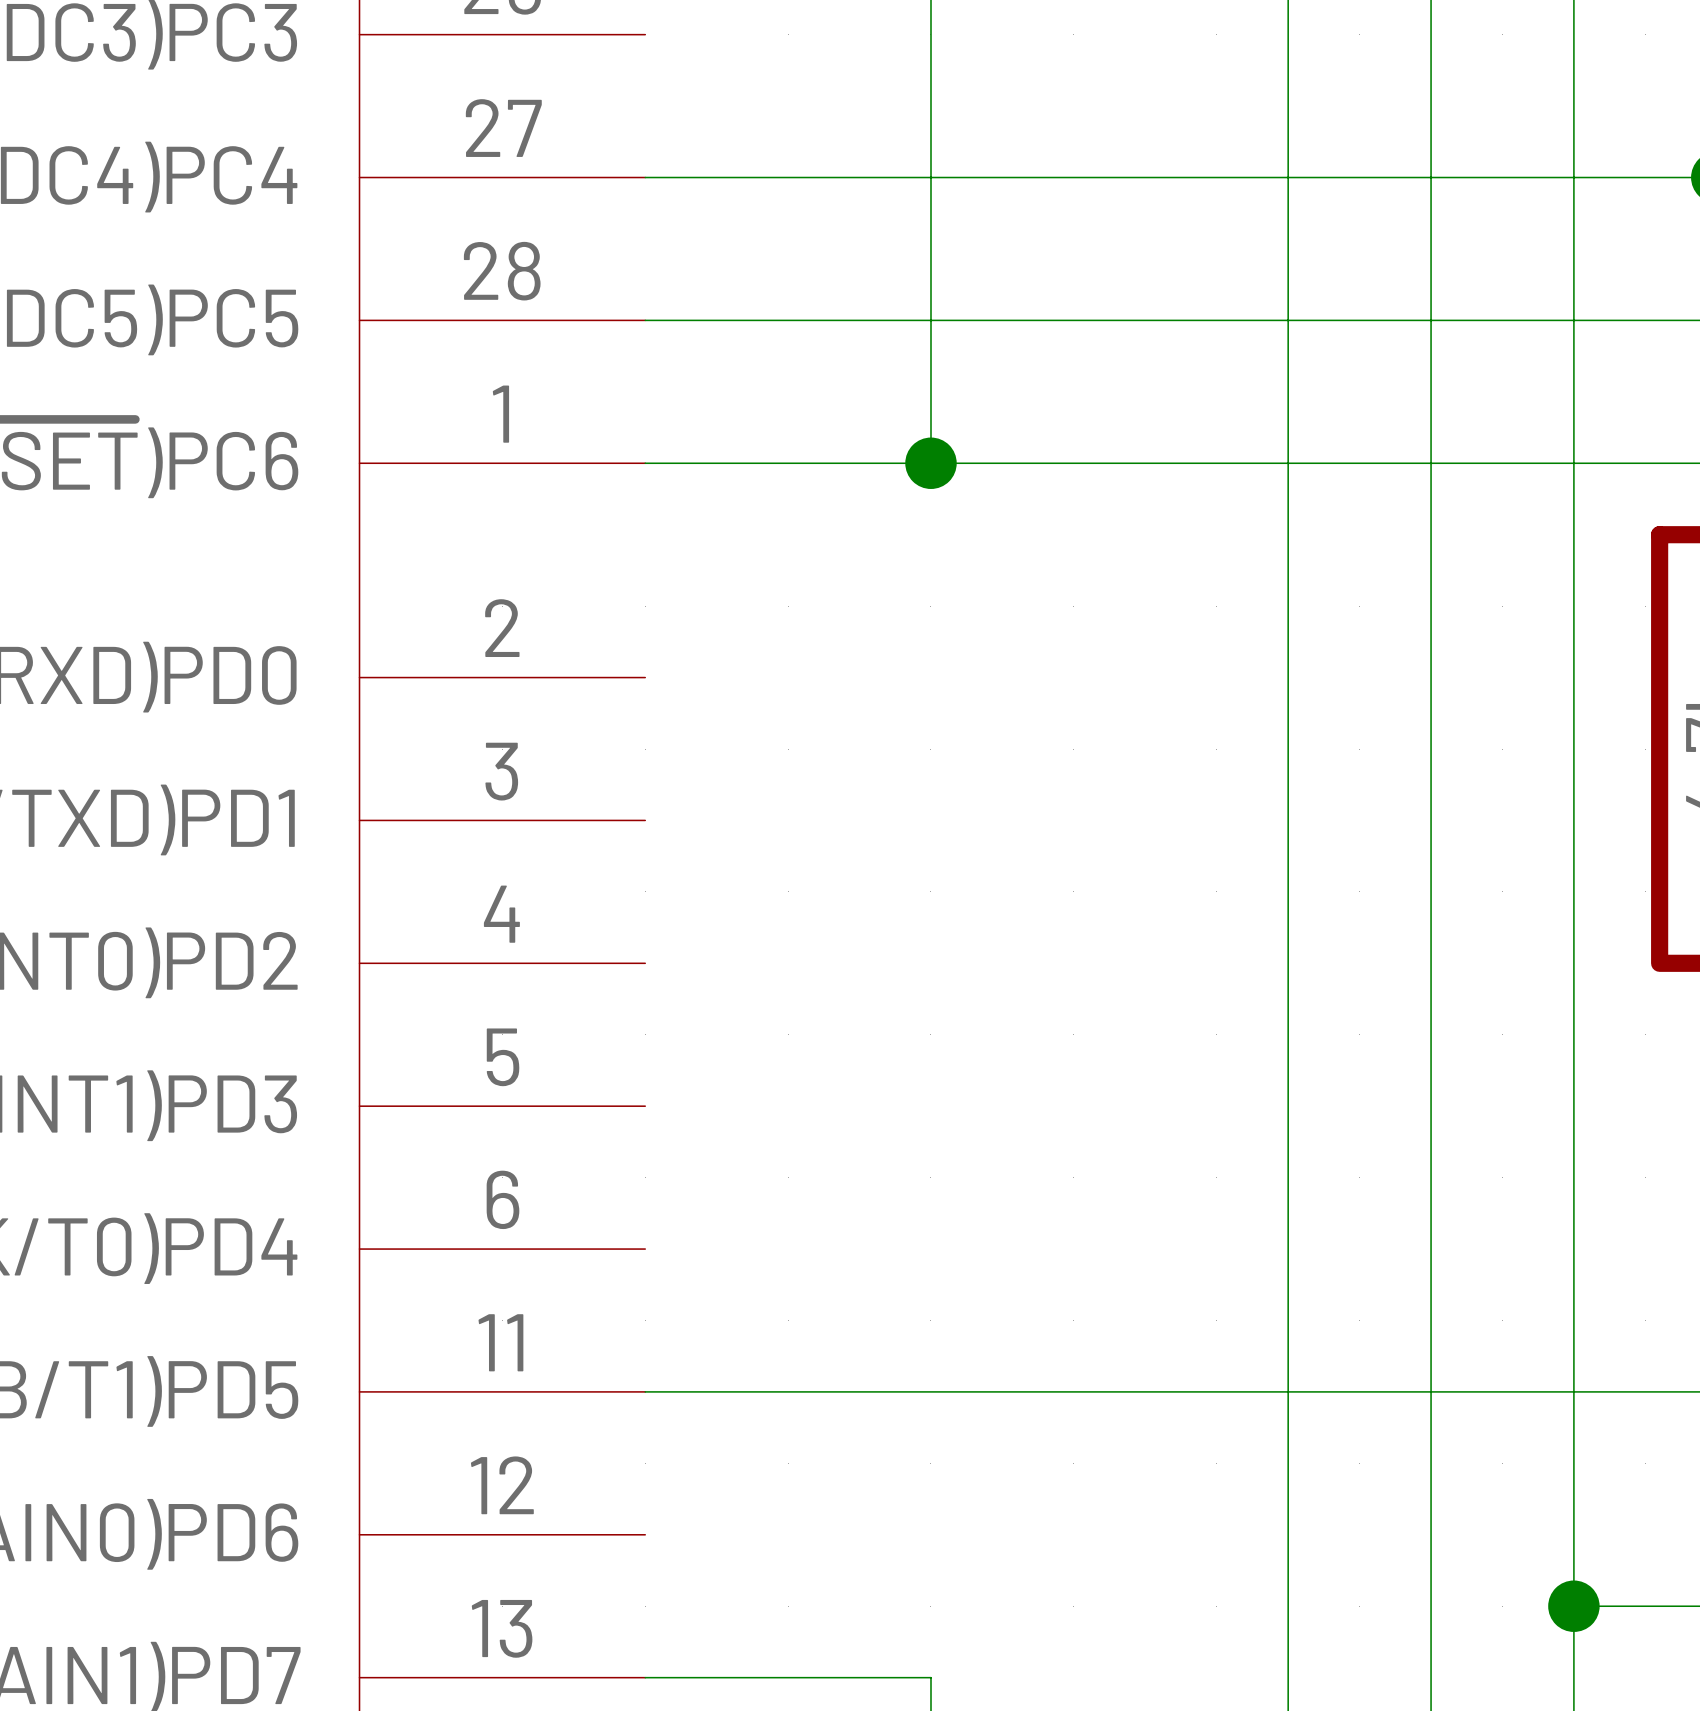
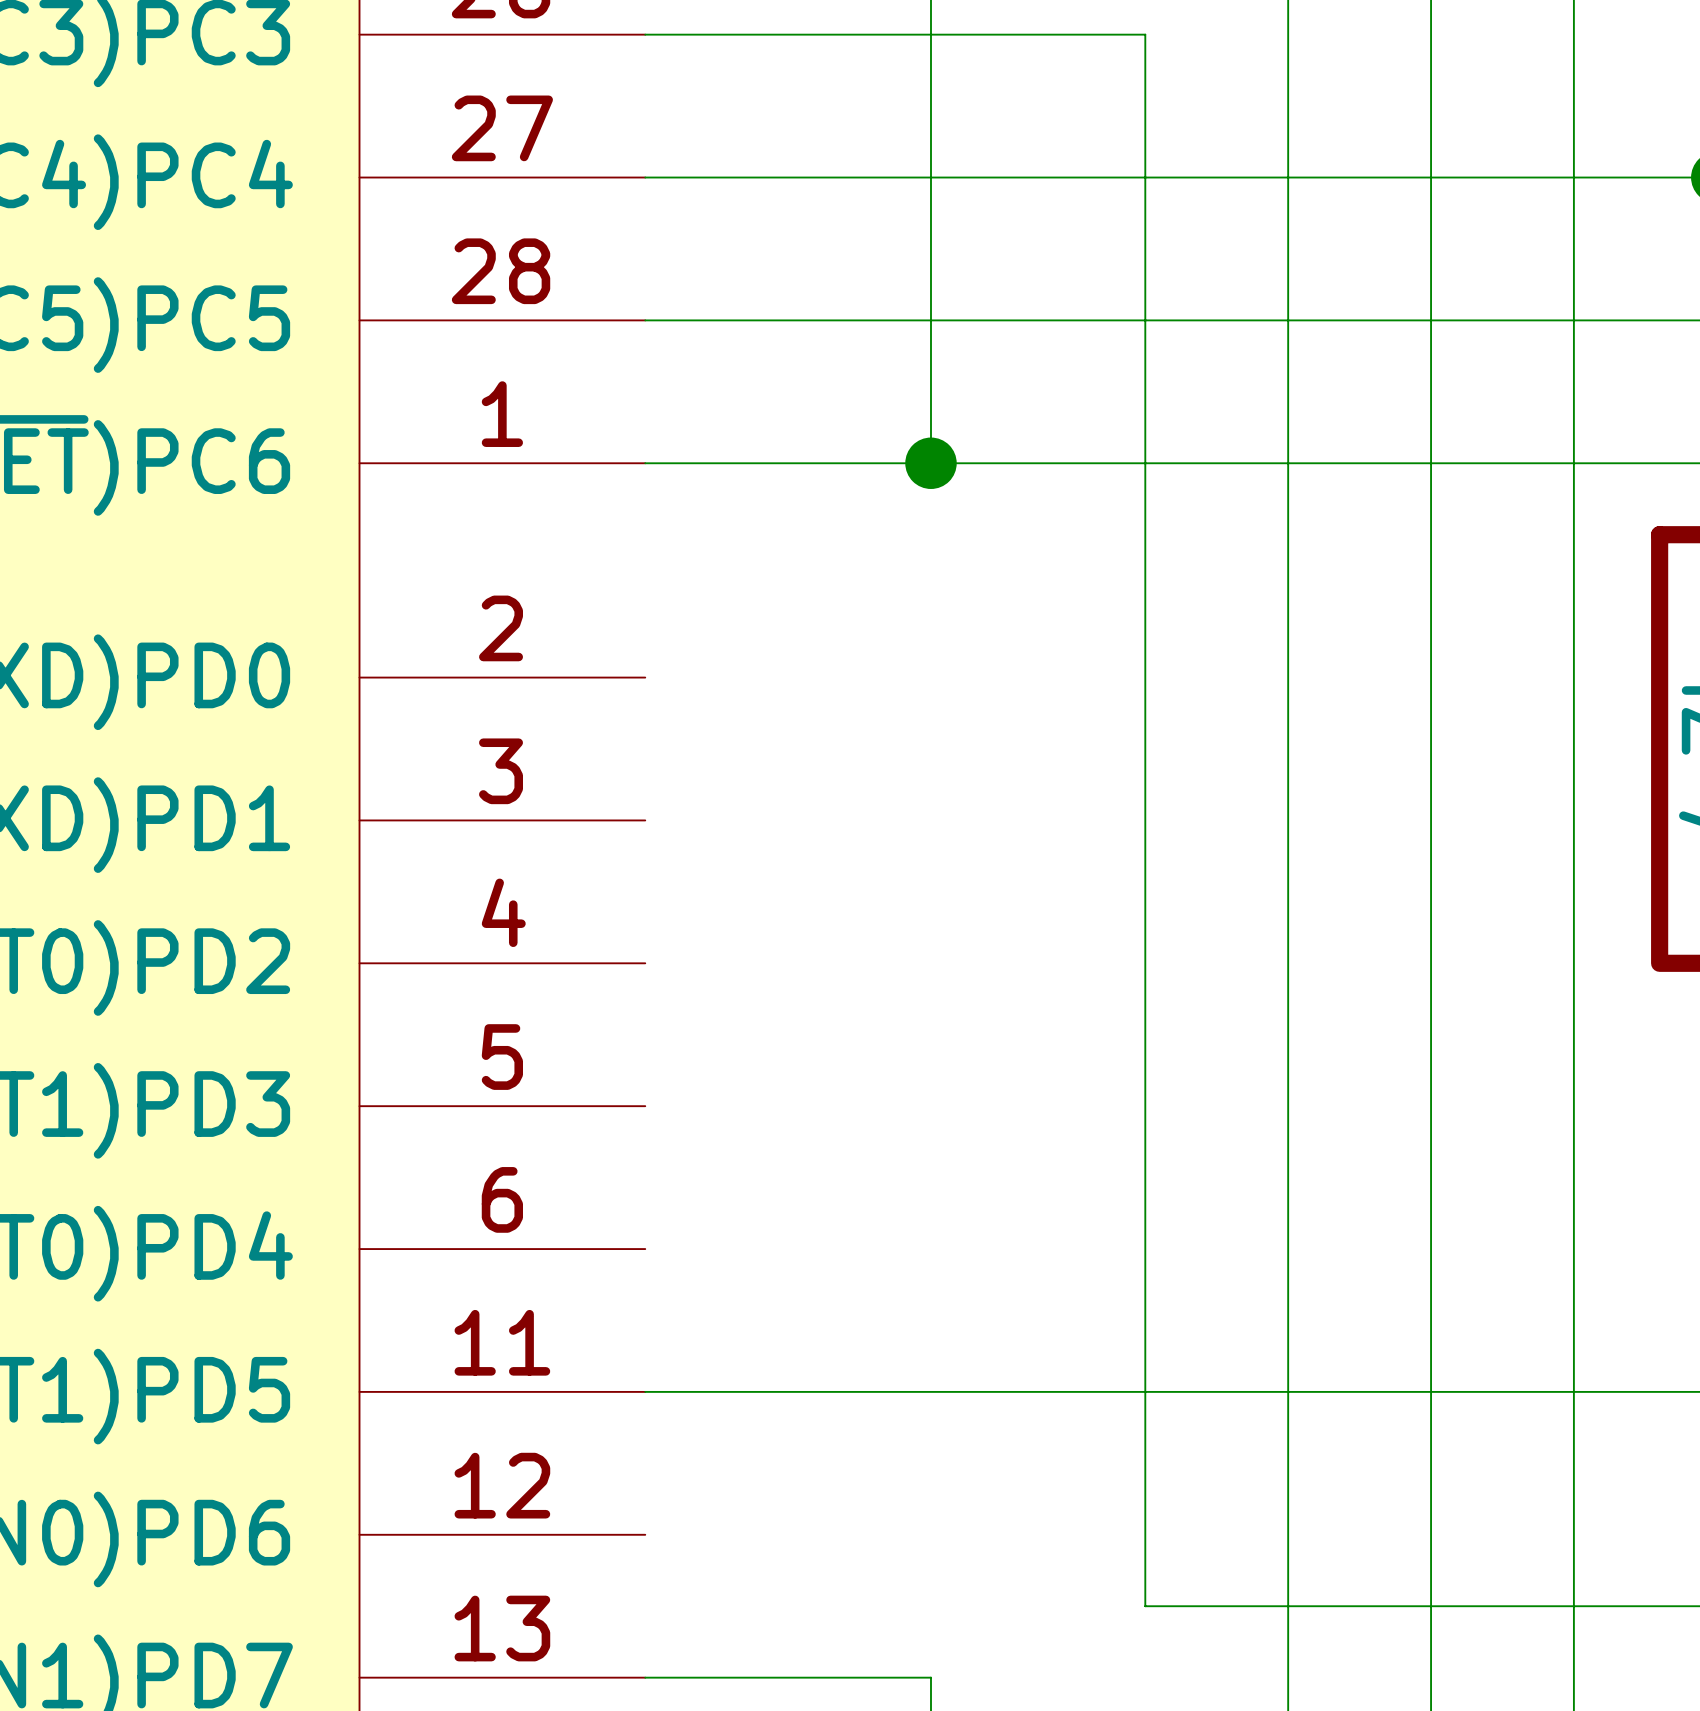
wire: none -> (645, 34) (1145, 34) (1145, 1606) (1573, 1606)
junction: (1573, 1606) -> none

